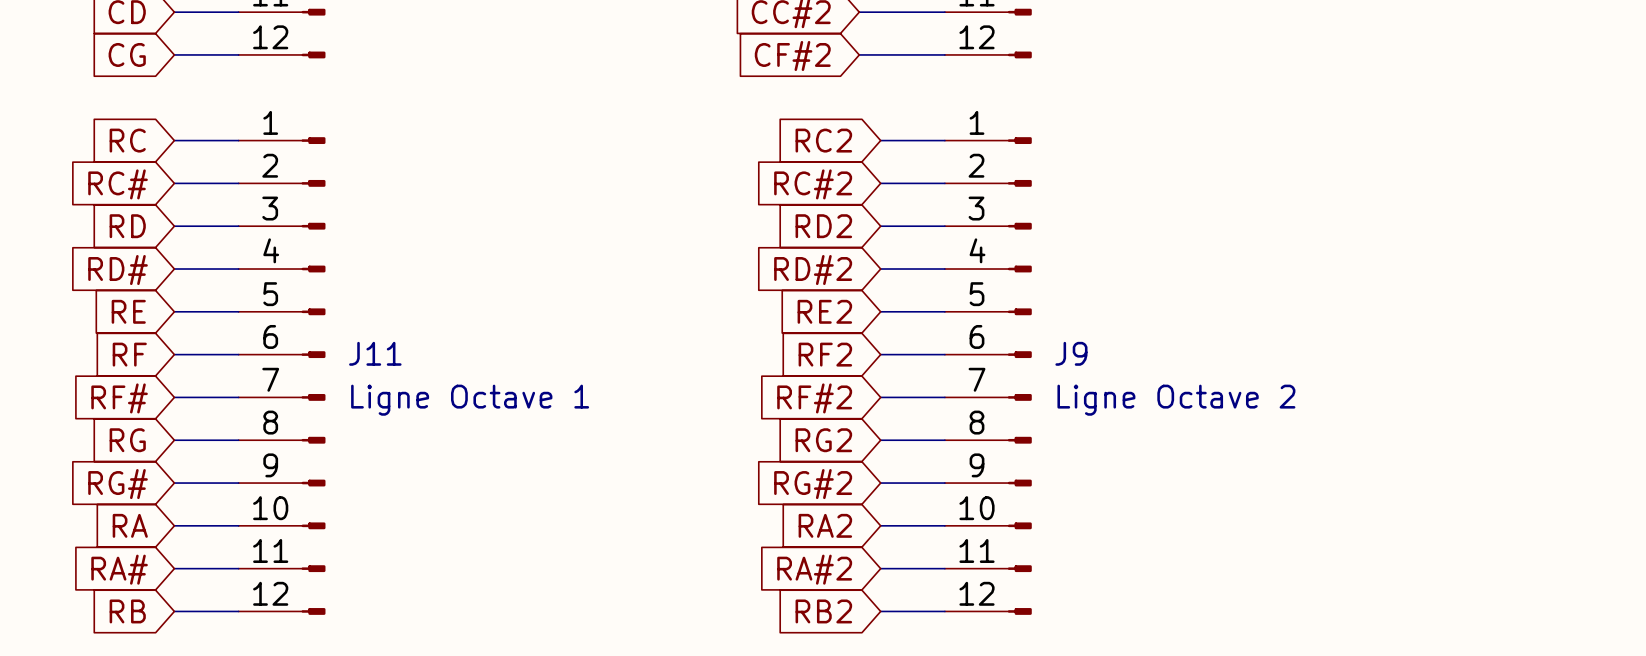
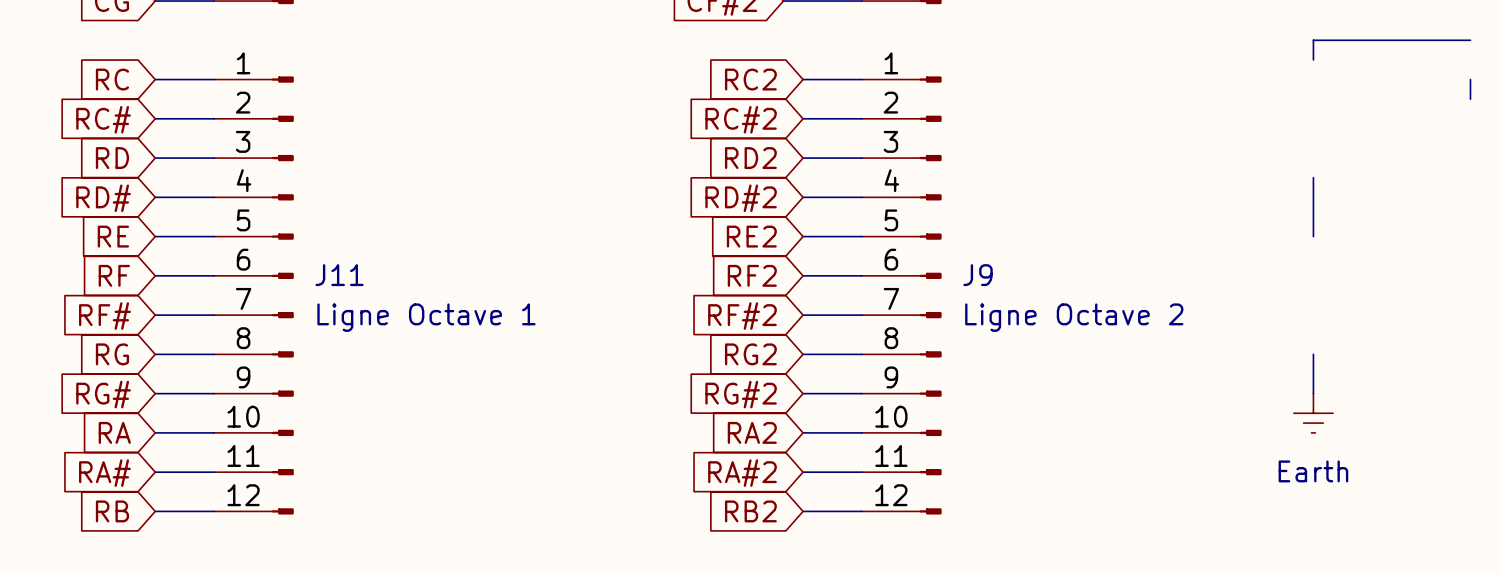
wire: none -> (1470, 40) (1313, 40) (1313, 59)
wire: none -> (1470, 79) (1470, 99)
wire: none -> (1313, 177) (1313, 236)
wire: none -> (1313, 354) (1313, 393)
power symbol: none -> Earth (1313, 413)

